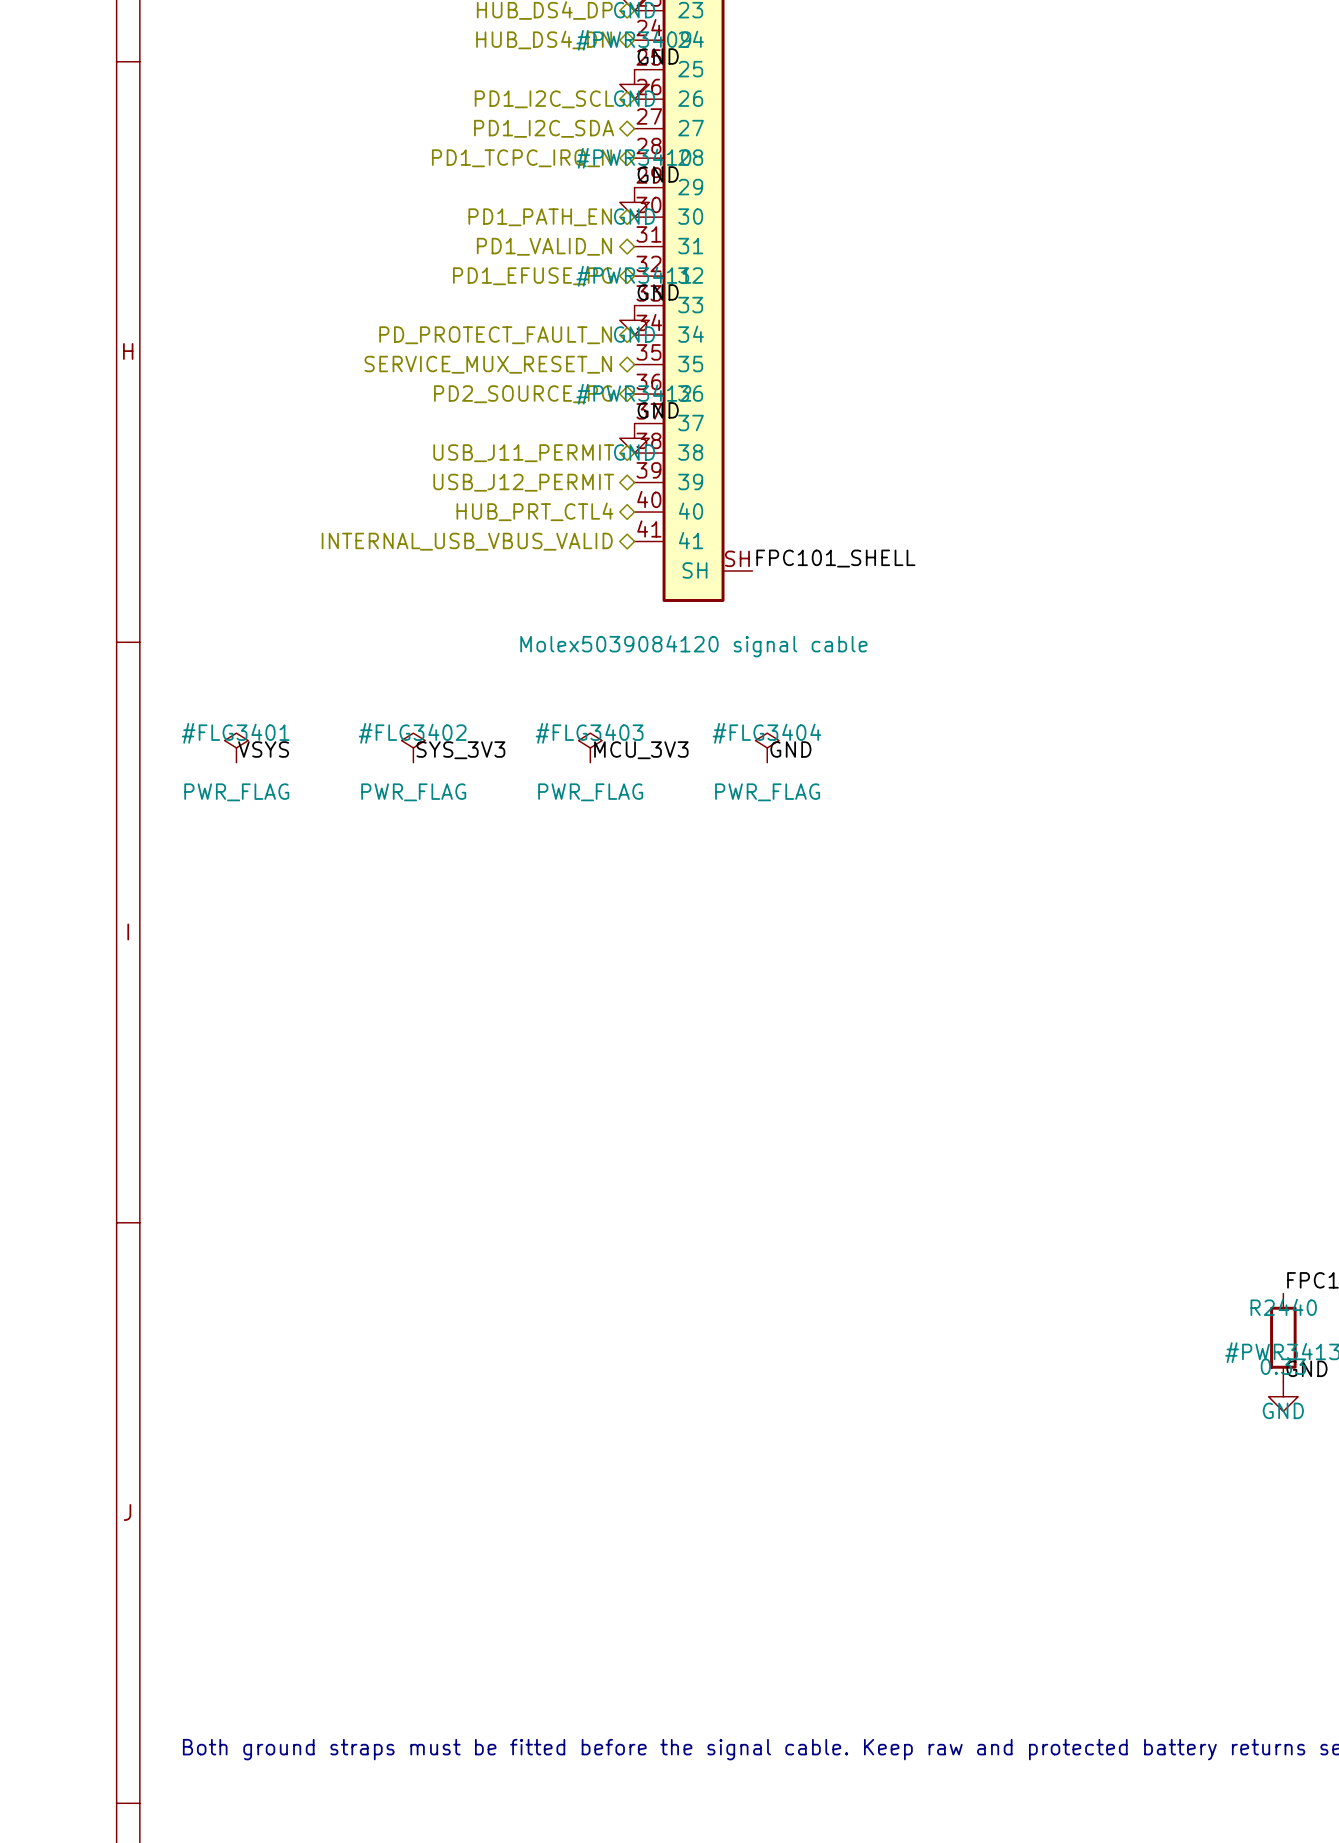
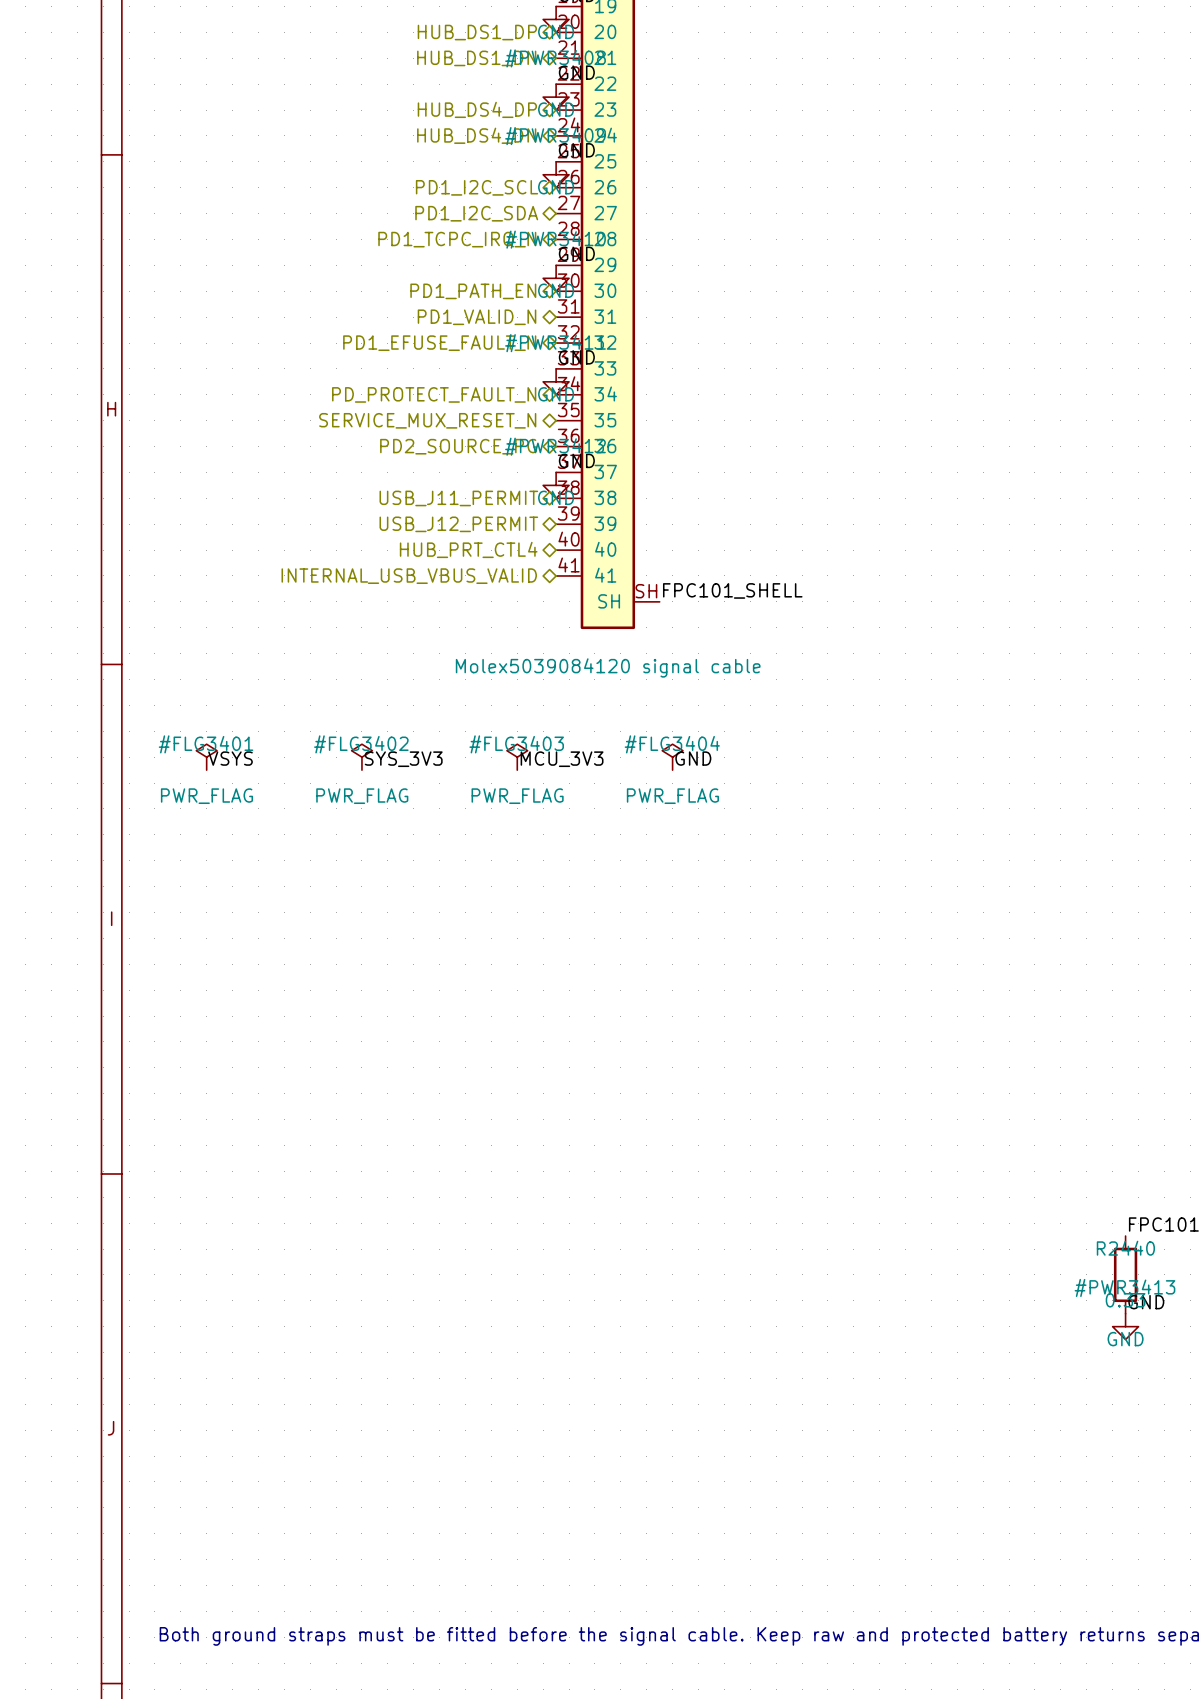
hierarchical label: PD1_EFUSE_PG (532, 276) -> PD1_EFUSE_FAULT_N (439, 343)

